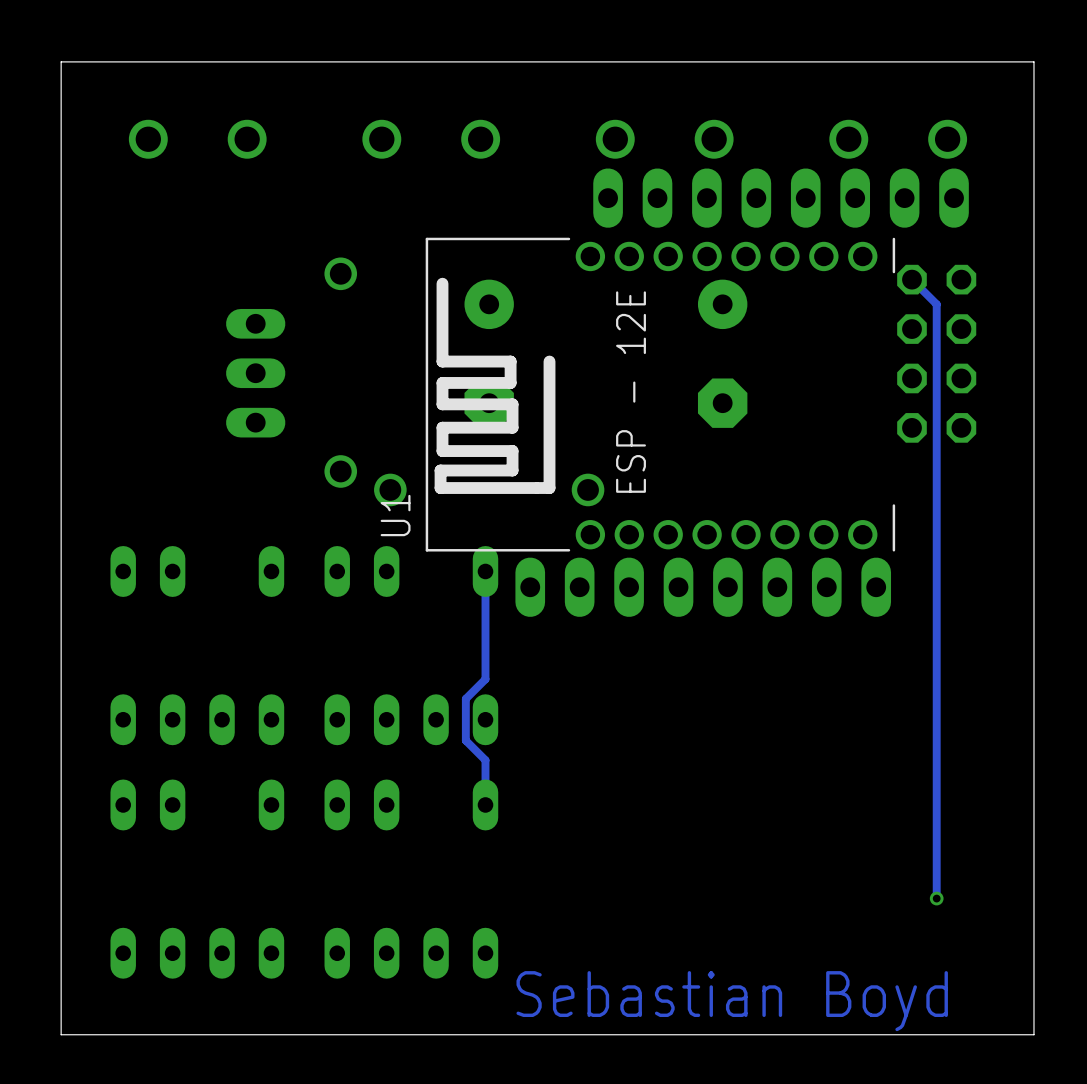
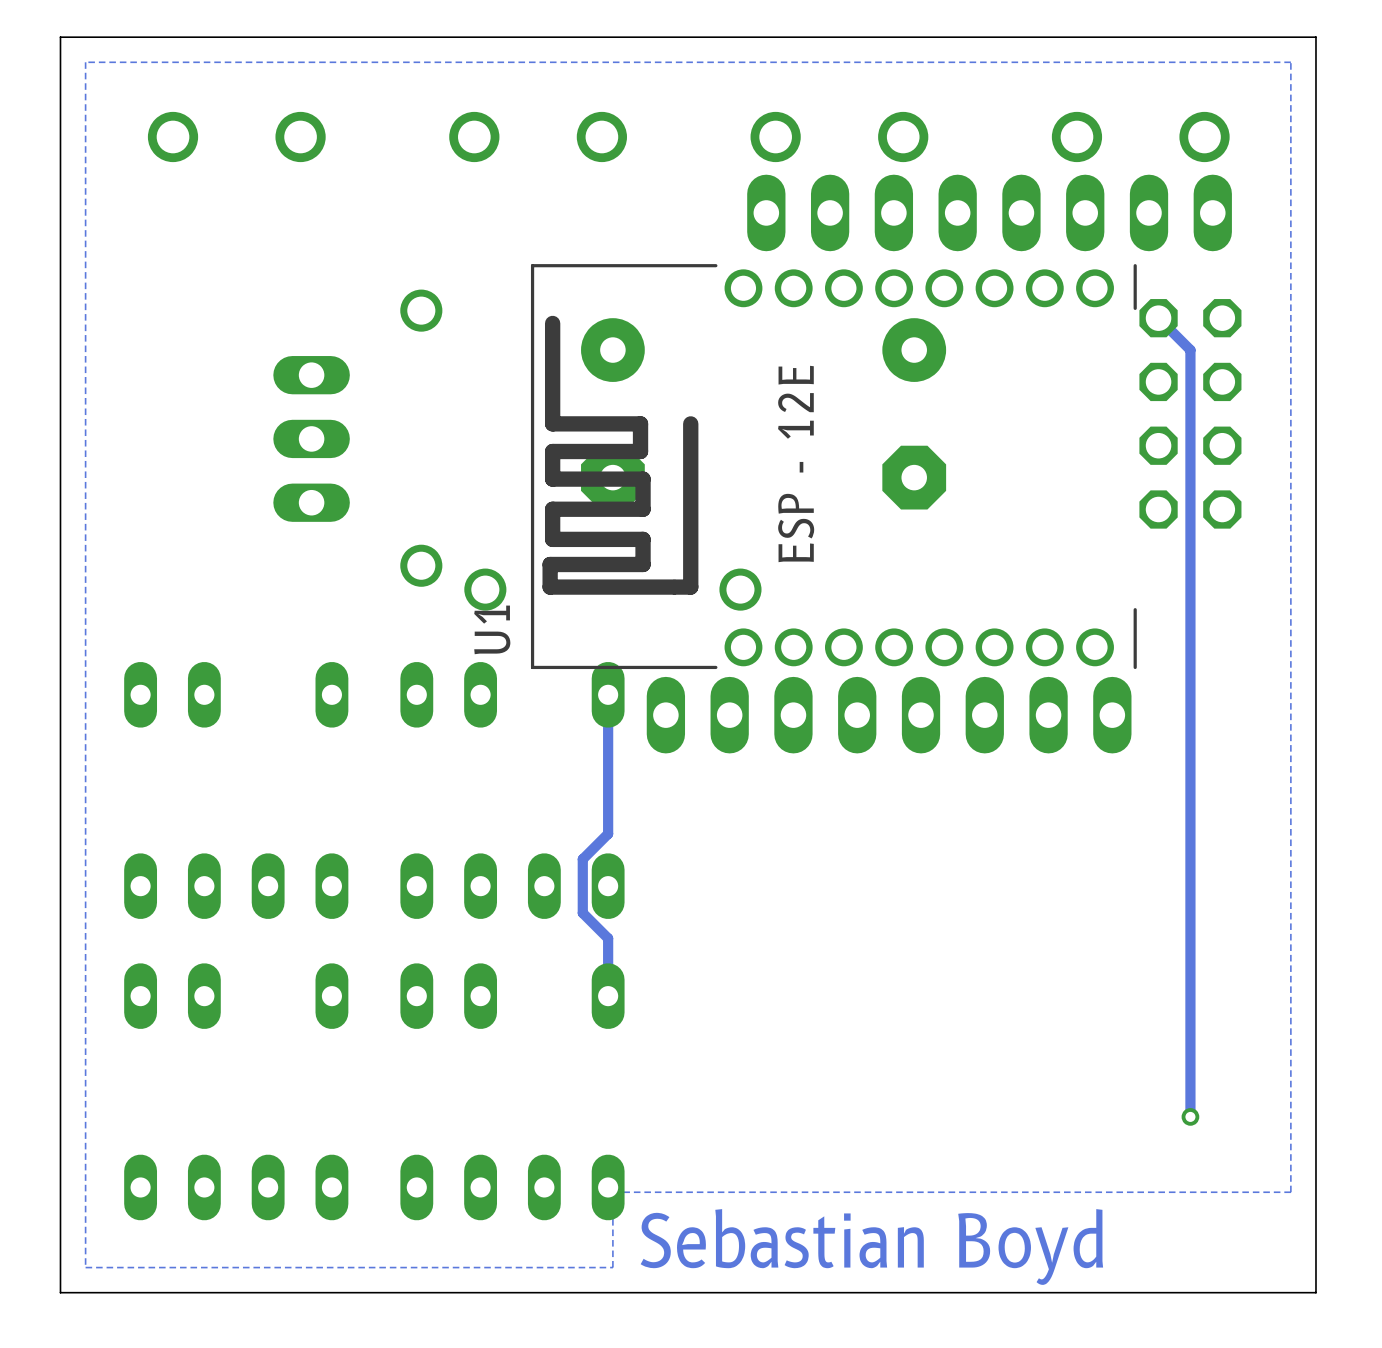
zone outline: none -> (1290, 62) (1290, 1192) (612, 1192) (612, 1267) (85, 1267) (85, 62) (1290, 62)

